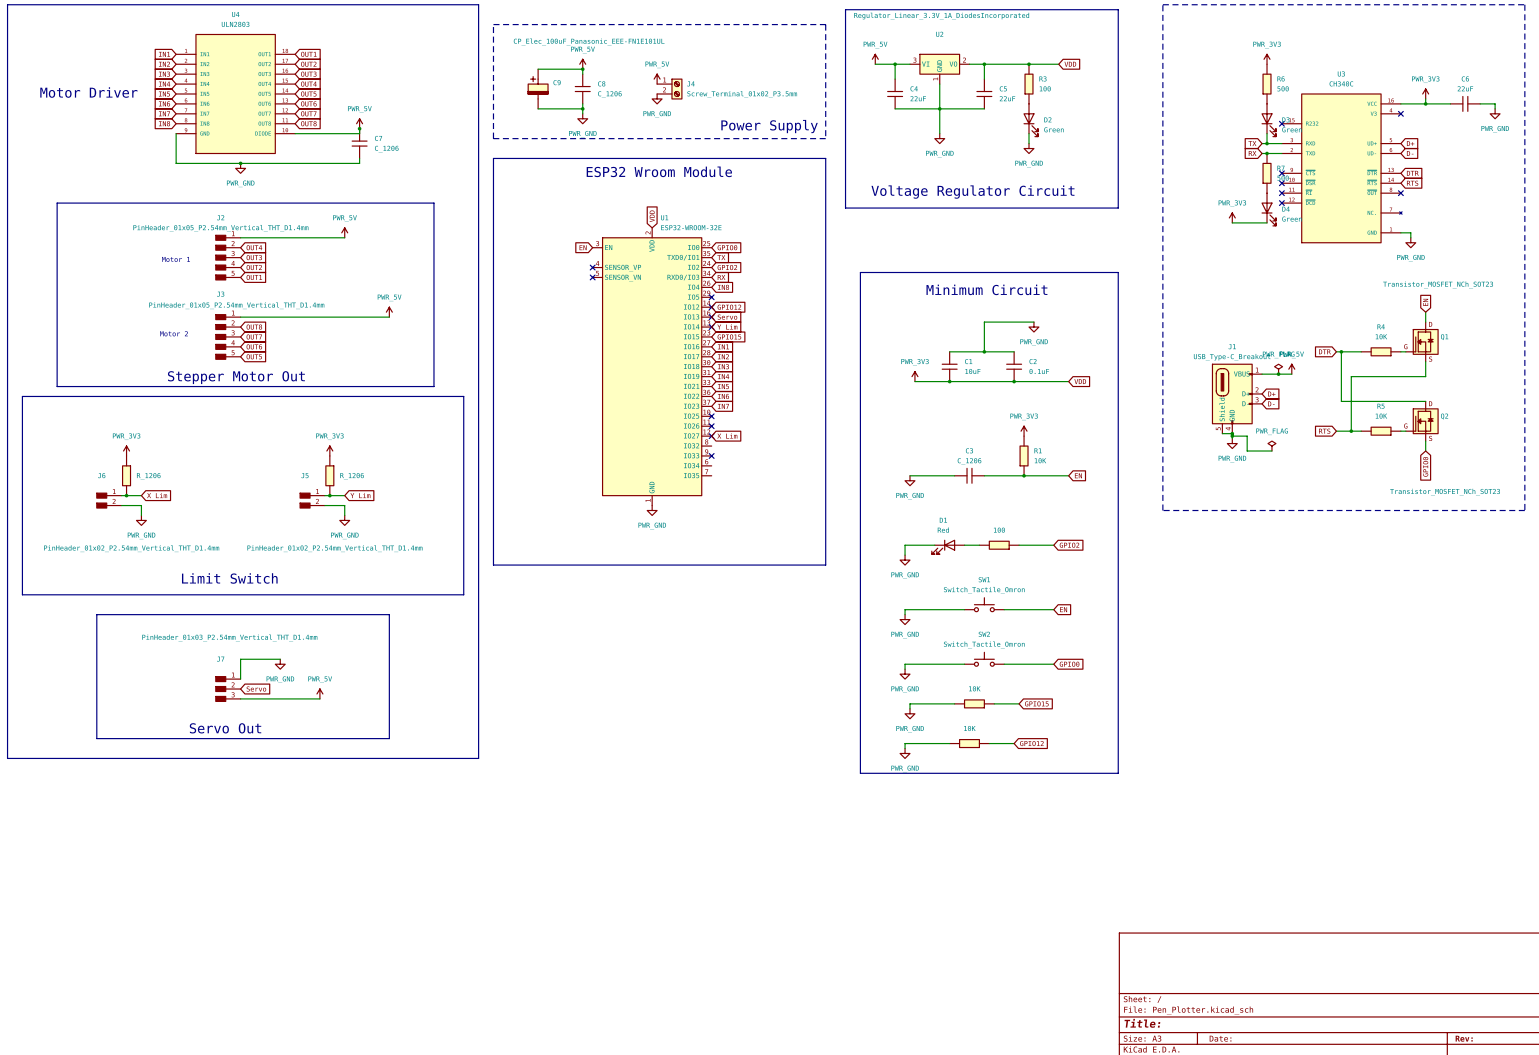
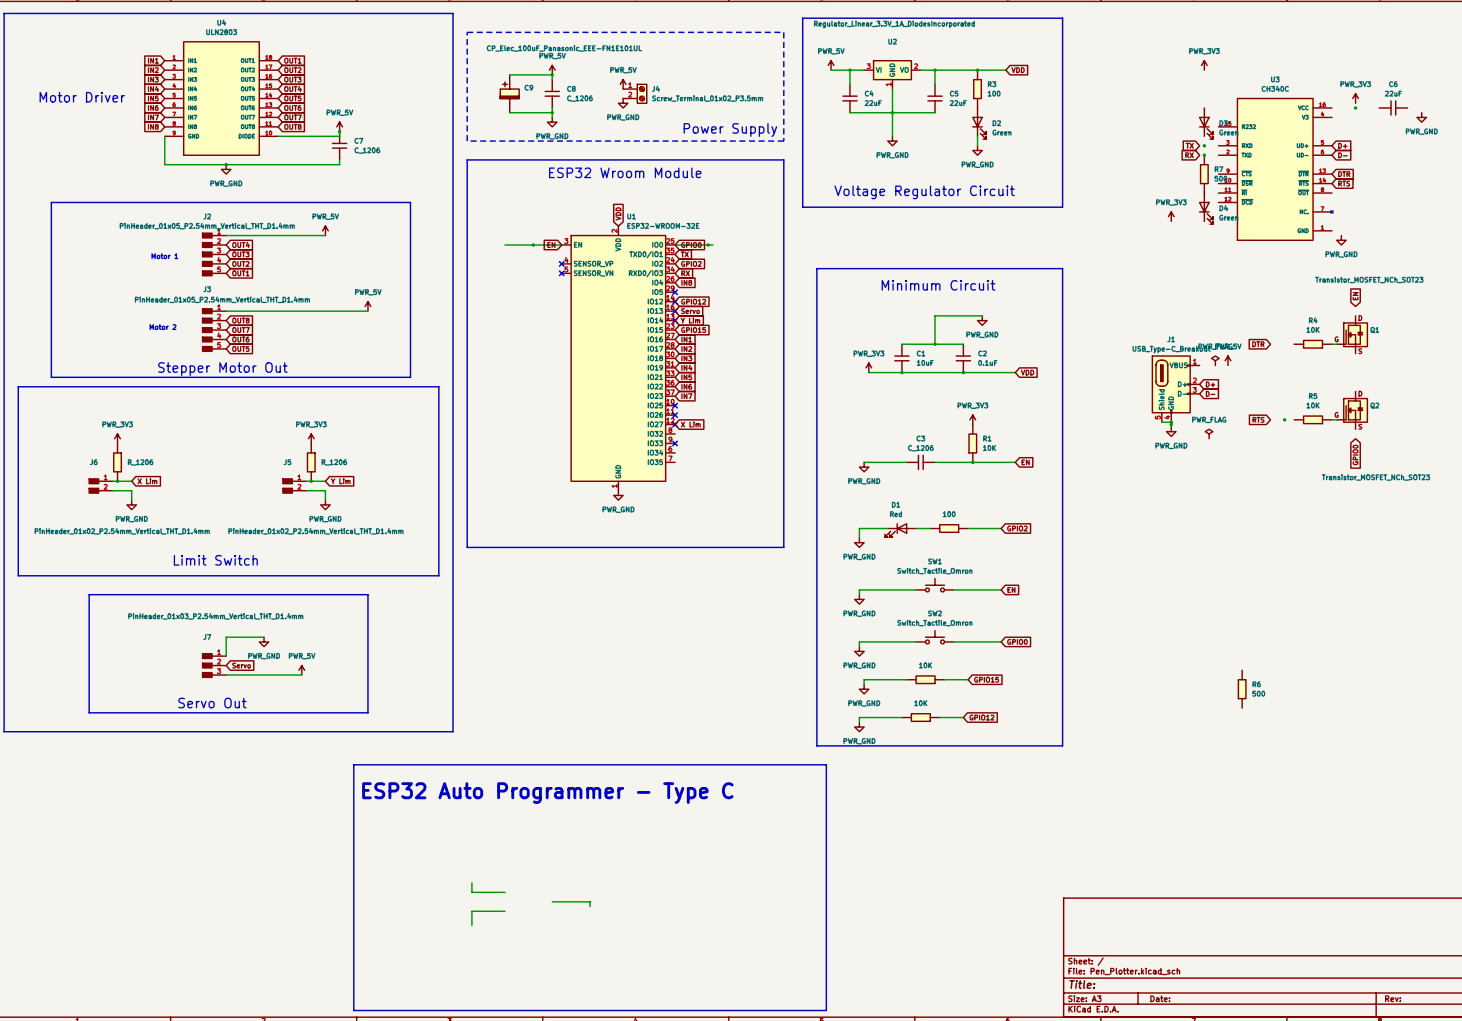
line: (1162, 4) (1524, 4) (1524, 510) (1162, 510) (1162, 4) -> none
part position: (1267, 84) -> (1242, 689)
wire: (1425, 98) (1425, 103) -> none
wire: (1400, 103) (1450, 103) -> none
wire: (1480, 103) (1495, 103) (1495, 108) -> none
no-connect mark: (1400, 113) -> none
no-connect mark: (1281, 123) -> none
wire: (1267, 133) (1267, 143) -> none
wire: (1262, 143) (1281, 143) -> none
wire: (1262, 153) (1281, 153) -> none
no-connect mark: (1281, 173) -> none
no-connect mark: (1281, 183) -> none
no-connect mark: (1281, 193) -> none
no-connect mark: (1400, 193) -> none
no-connect mark: (1281, 203) -> none
wire: (1232, 222) (1267, 222) -> none
wire: (1400, 232) (1410, 232) (1410, 237) -> none
wire: none -> (505, 245) (561, 245)
junction: none -> (533, 245)
wire: none -> (675, 245) (712, 245)
junction: none -> (708, 245)
wire: (1425, 312) (1425, 322) -> none
wire: (1336, 351) (1361, 351) -> none
wire: (1341, 351) (1341, 401) (1425, 401) -> none
junction: (1341, 351) -> none
wire: (1425, 361) (1425, 376) (1351, 376) (1351, 431) -> none
wire: (1262, 374) (1291, 374) -> none
junction: (1278, 374) -> none
wire: (1336, 431) (1361, 431) -> none
wire: (1232, 436) (1247, 436) (1247, 451) (1271, 451) -> none
wire: (1425, 441) (1425, 451) -> none
line: none -> (353, 764) (826, 764) (826, 1010) (353, 1010) (353, 764)
text: none -> ESP32 Auto Programmer - Type C (547, 793)
wire: none -> (471, 882) (471, 892) (505, 892)
wire: none -> (552, 901) (590, 901) (590, 906)
wire: none -> (505, 911) (471, 911) (471, 925)

